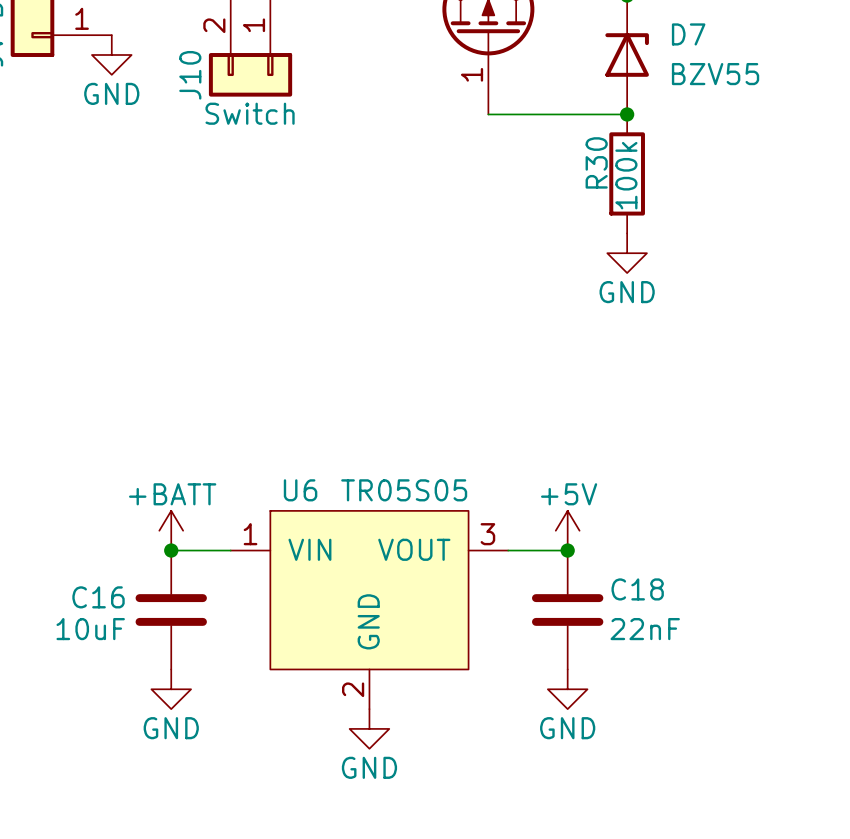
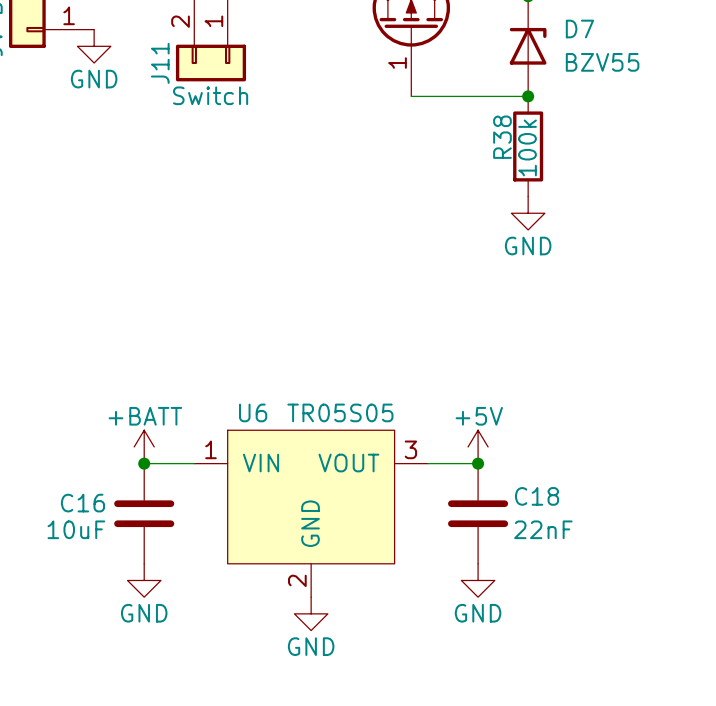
J10 name: J10 (190, 75) -> J11 (160, 63)
R30 name: R30 (596, 162) -> R38 (502, 137)

